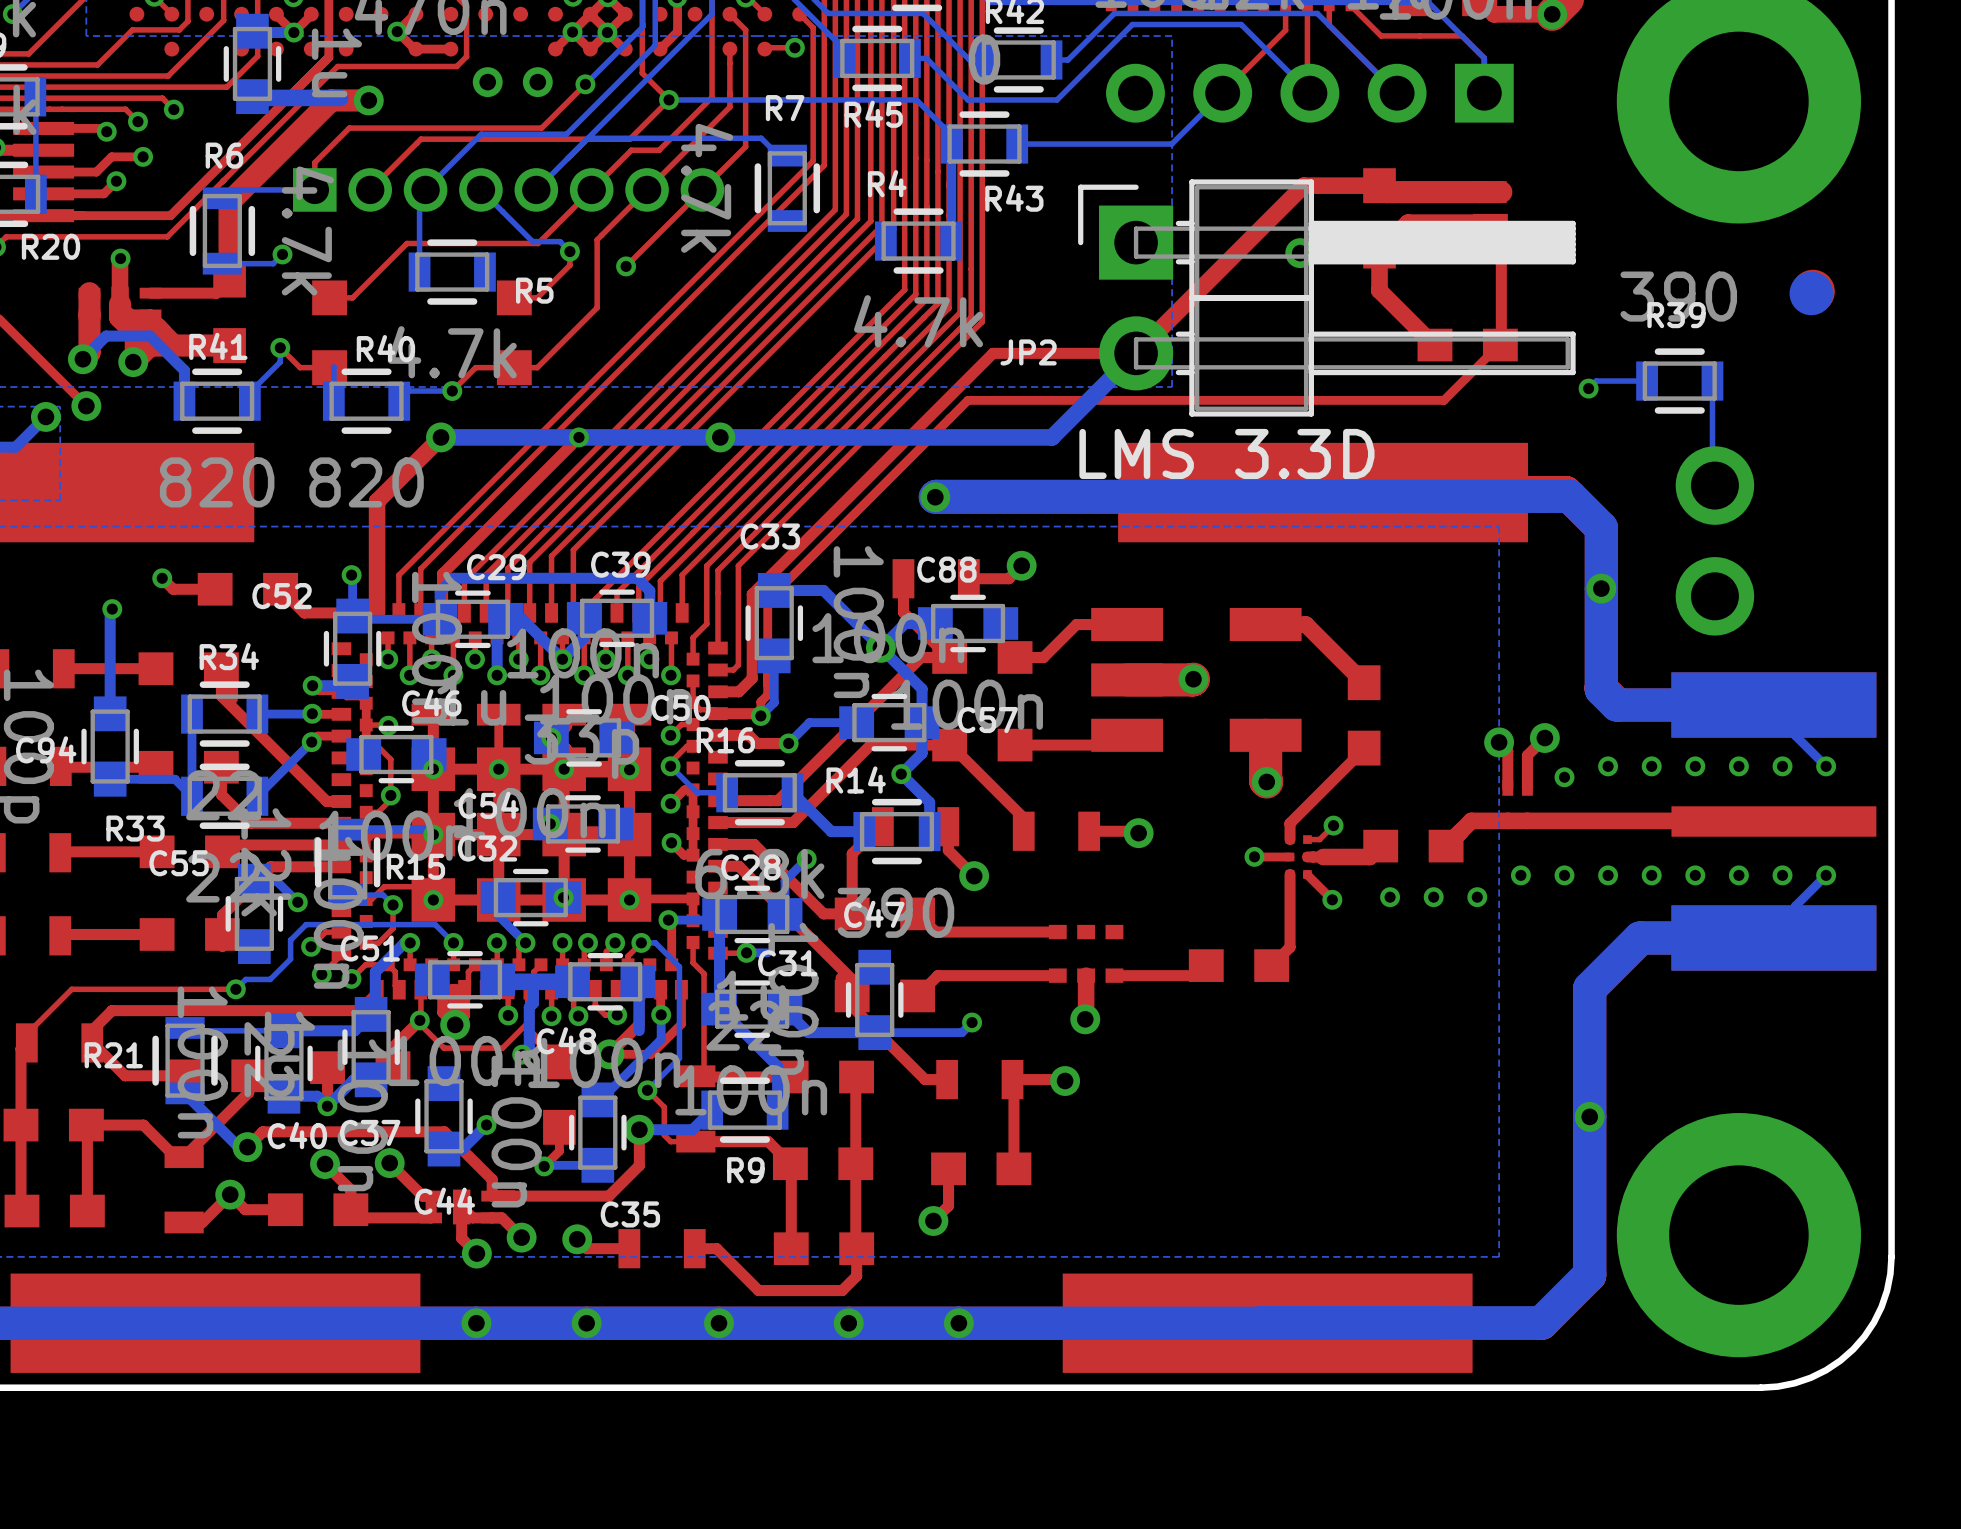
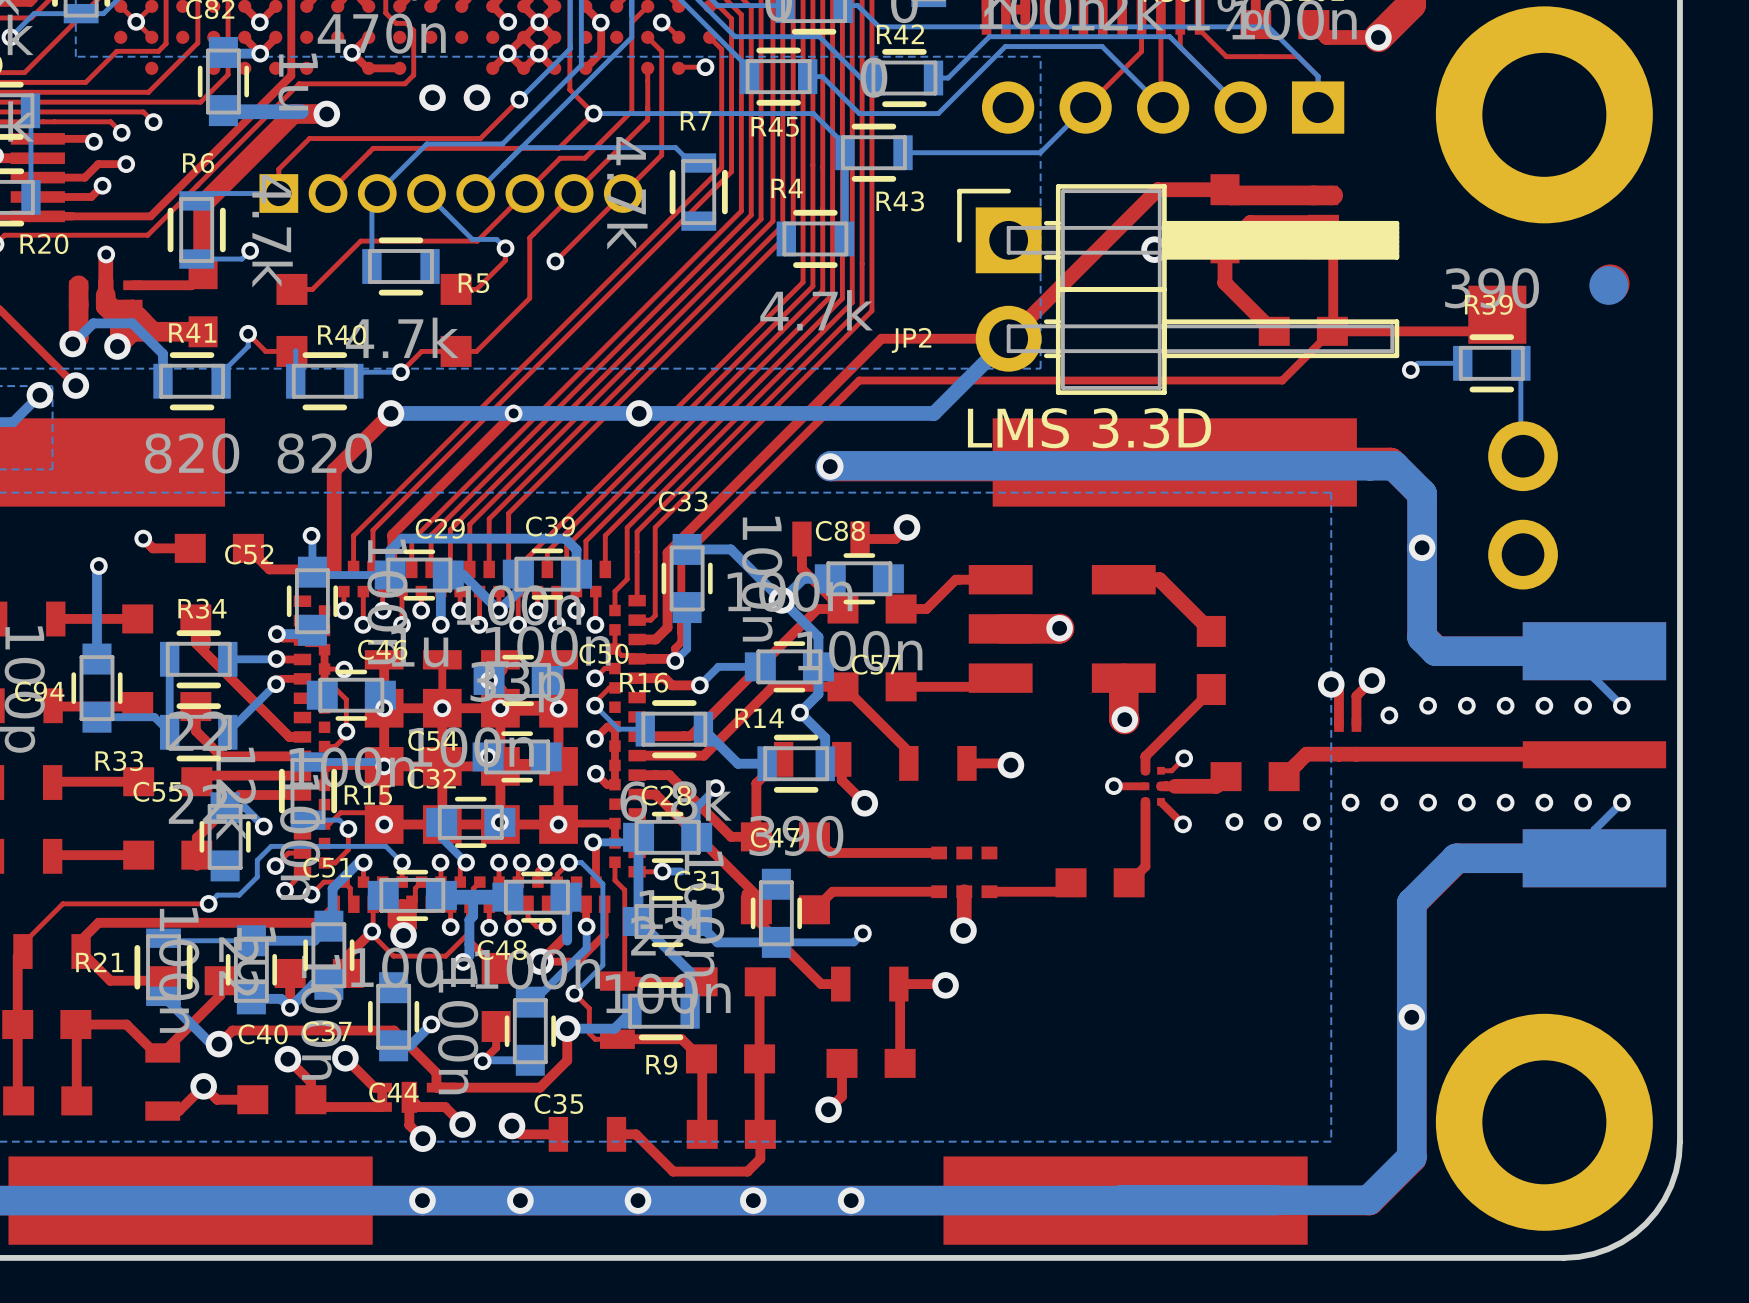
top track: none -> (1497, 314) (1480, 331) (1332, 331)
part: none -> (1497, 314)
part footprint: [1671, 672, 1877, 971] -> [1522, 622, 1667, 888]

